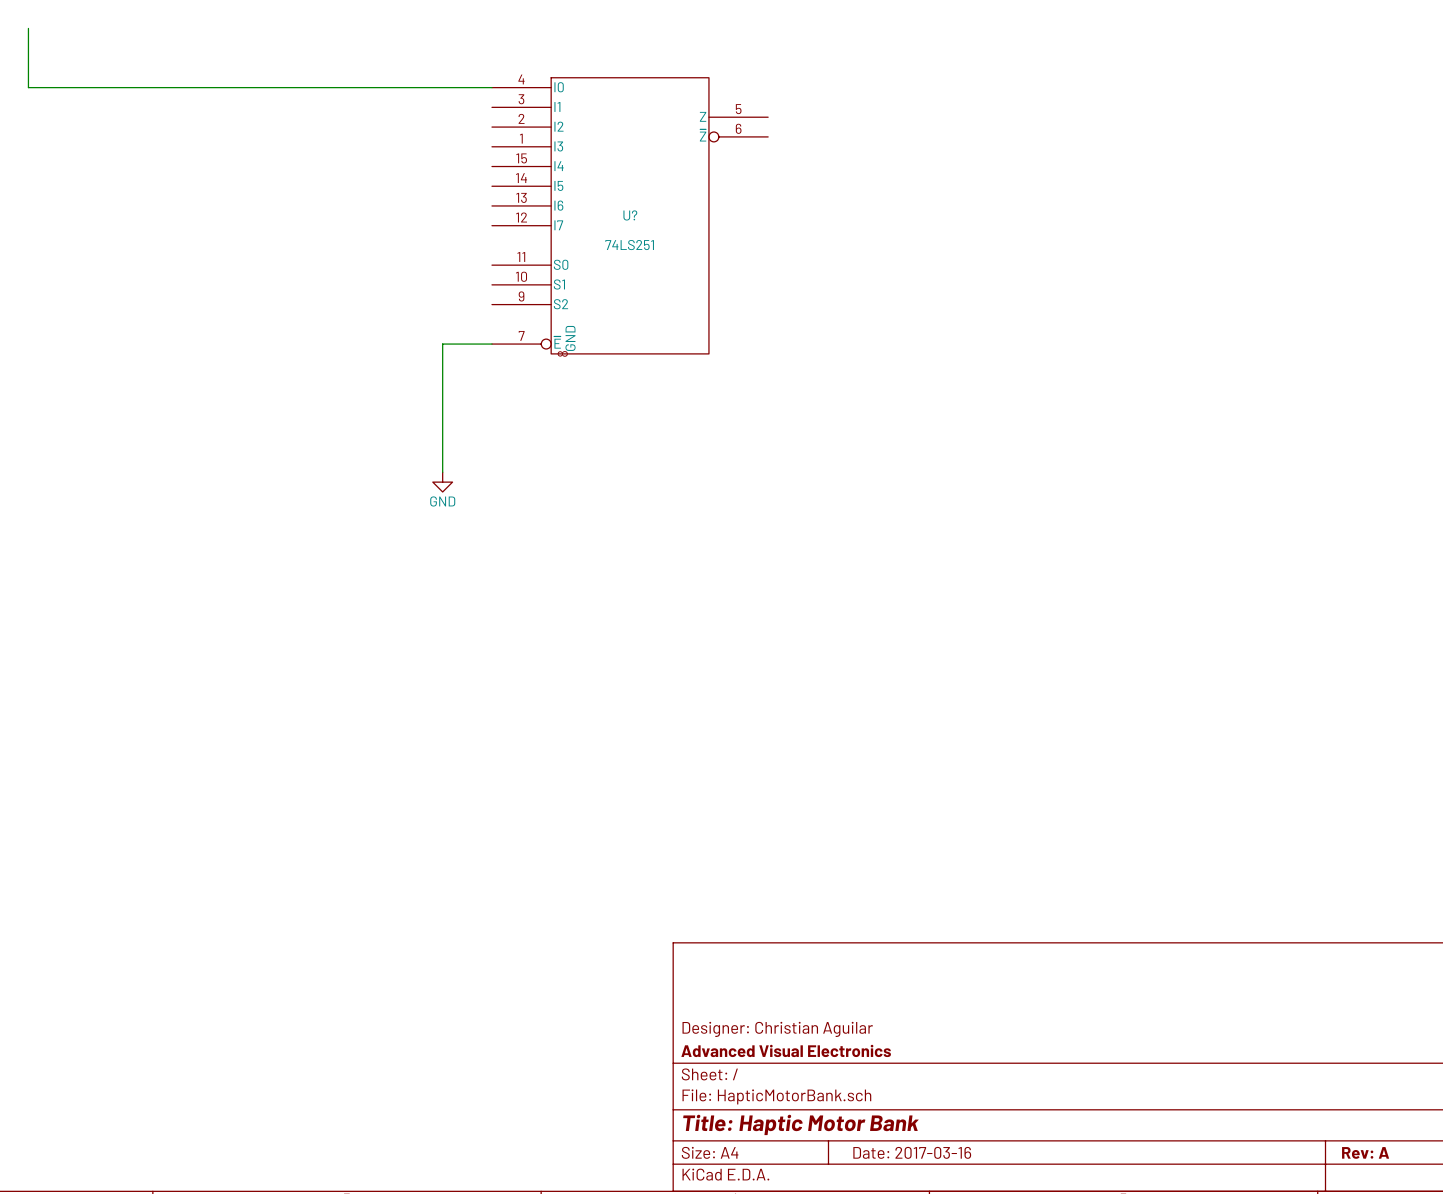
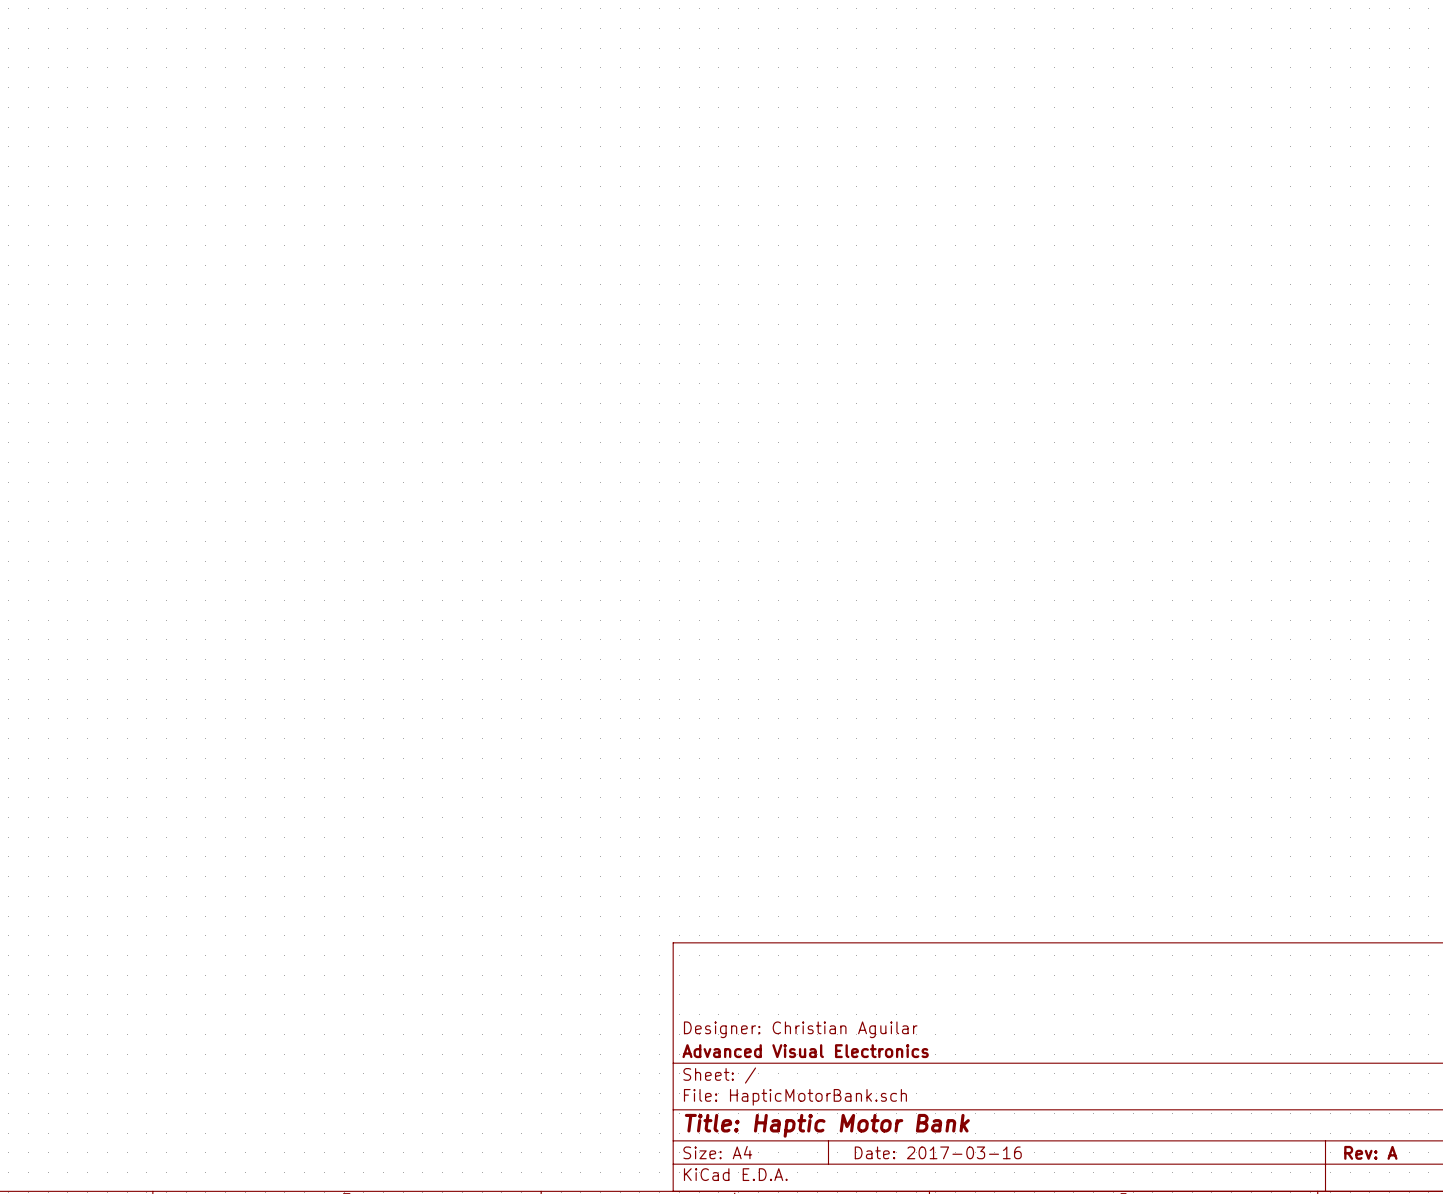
wire: (28, 28) (28, 87) (491, 87) -> none
U?: 74LS251 (630, 215) -> none
wire: (491, 344) (442, 344) (442, 472) -> none
power symbol: GND (442, 482) -> none

